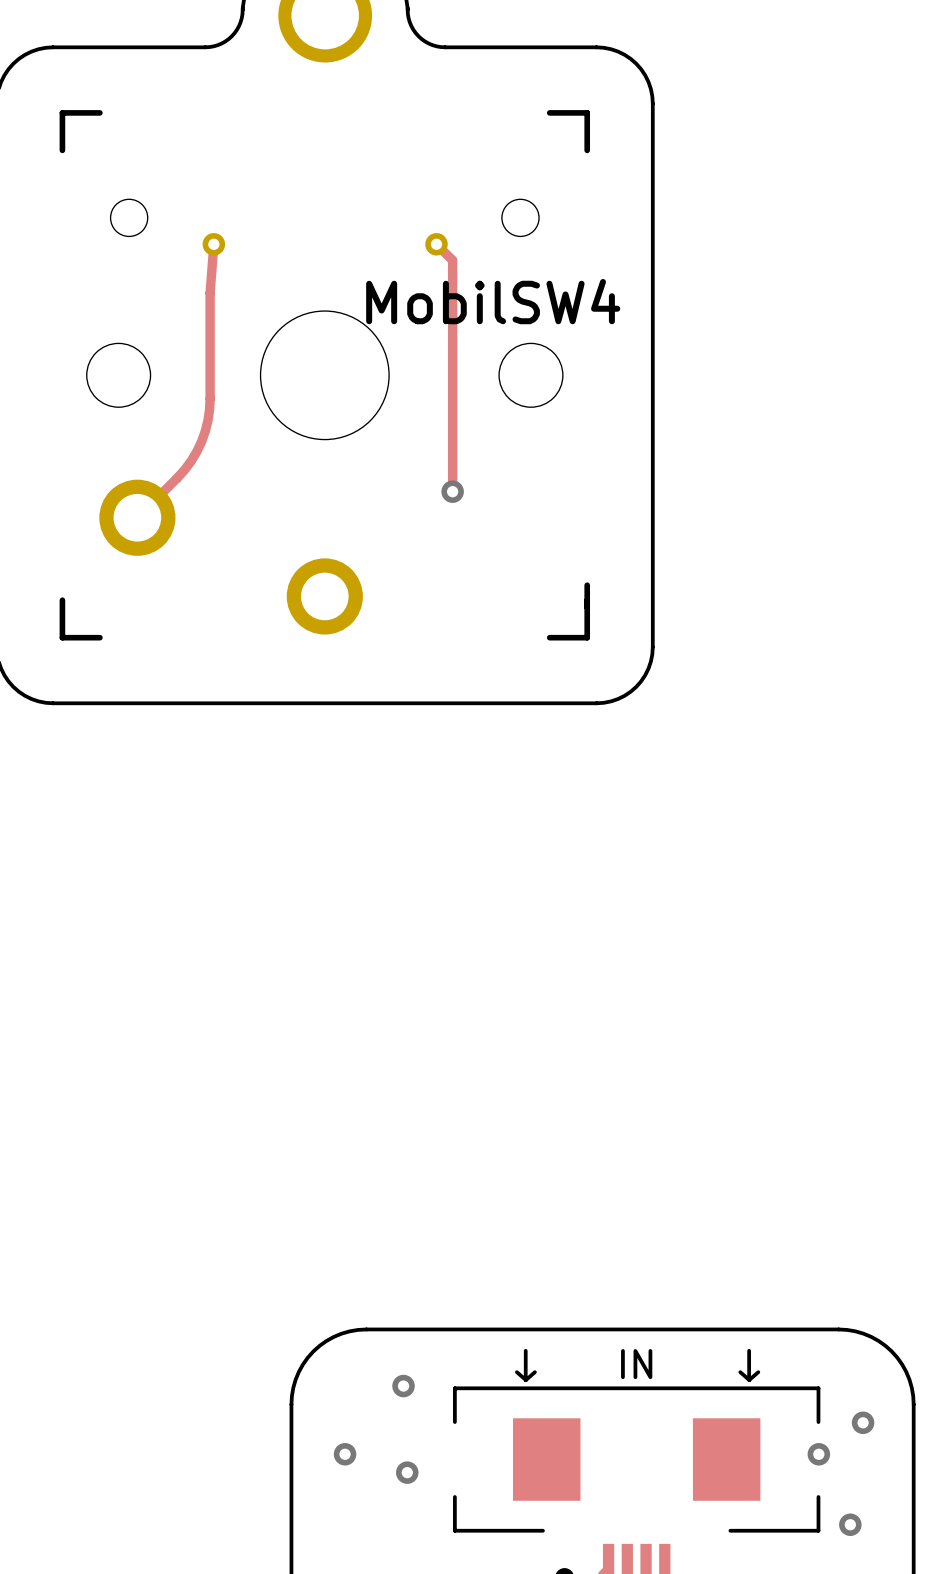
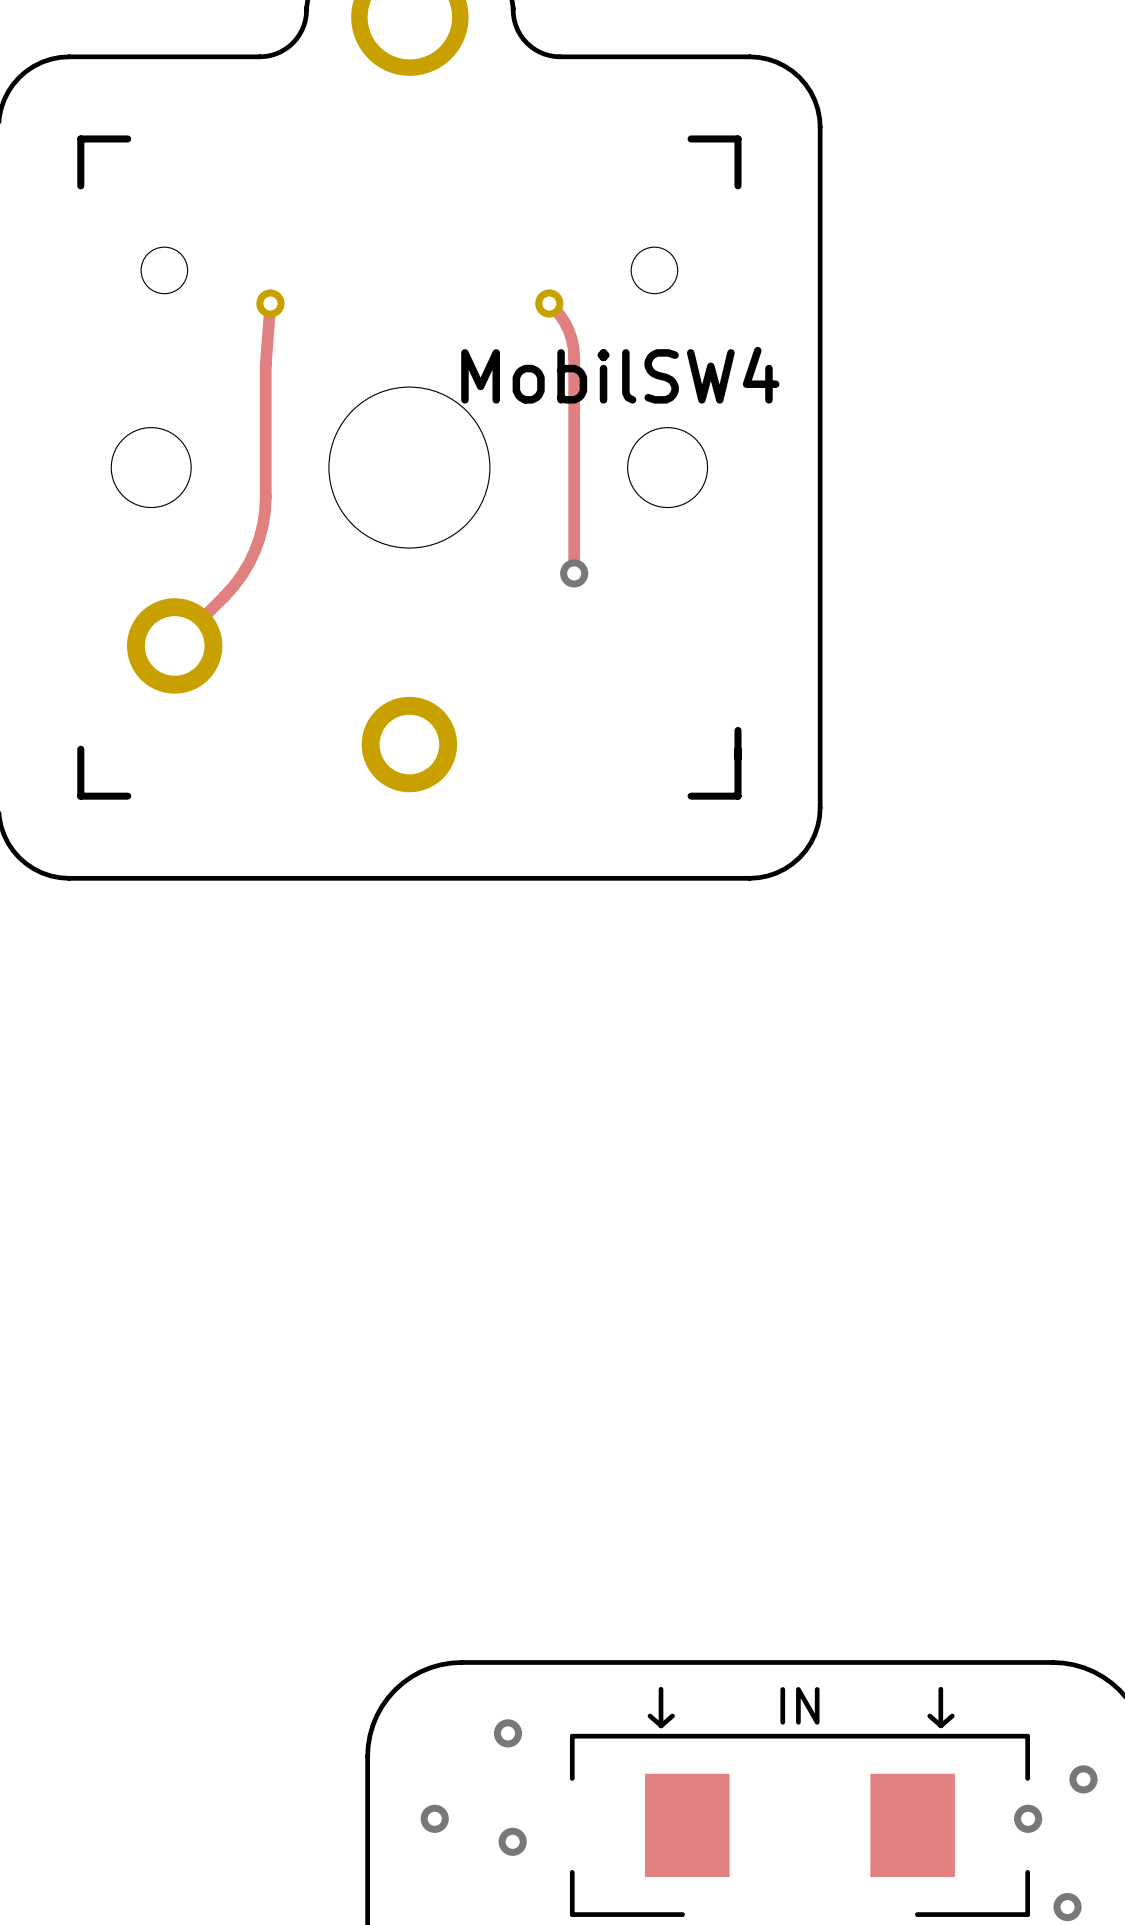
track: (439, 247) (452, 260) (452, 491) -> (553, 307) (564, 322) (573, 348) (574, 573)
via position: (452, 491) -> (574, 573)

